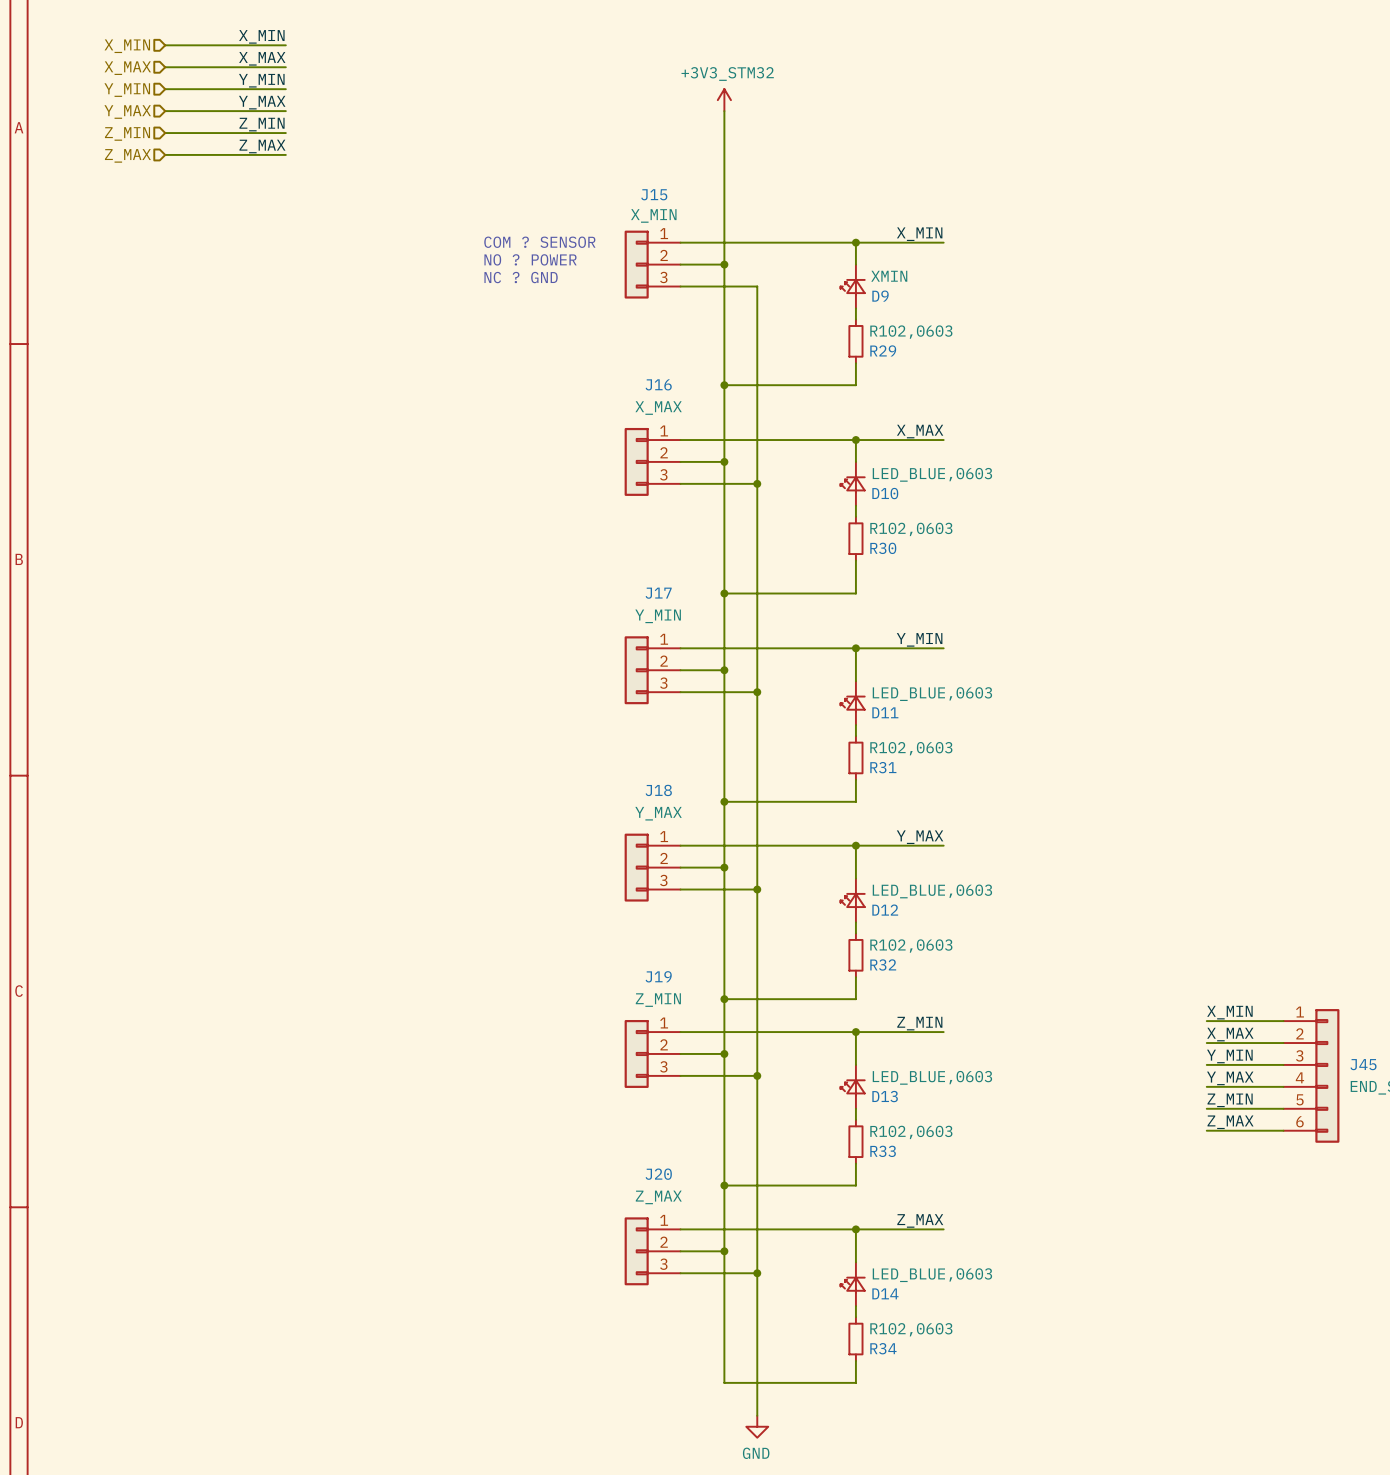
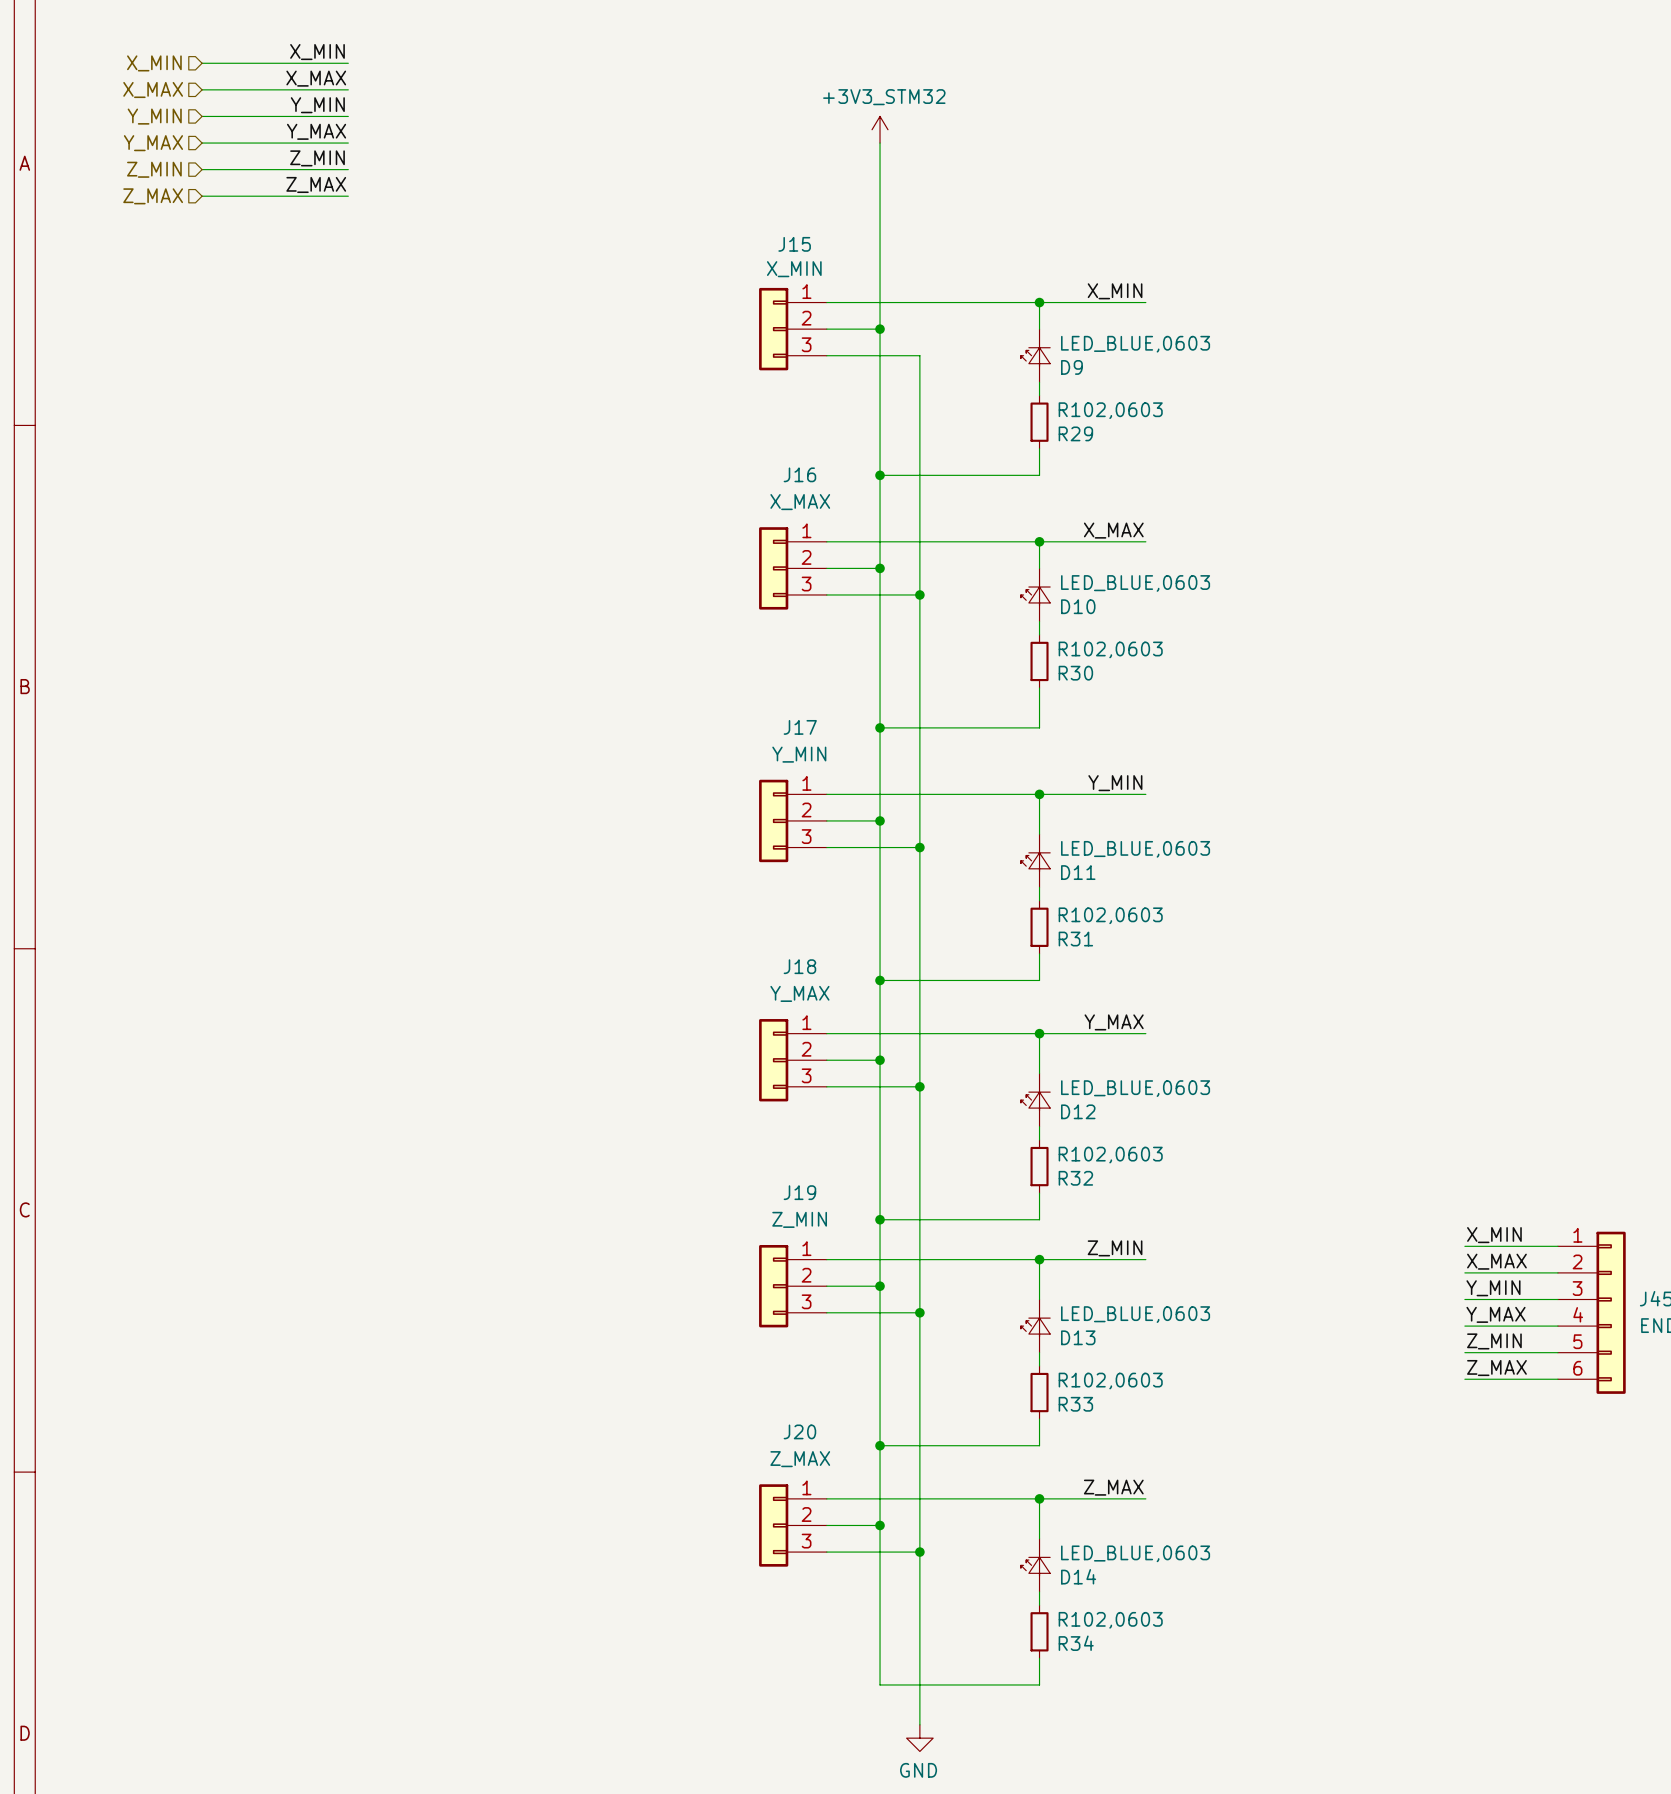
text: COM ? SENSOR (539, 242) -> none
text: NO ? POWER (530, 259) -> none
D9 value: XMIN (889, 276) -> LED_BLUE,0603 (1135, 344)
text: NC ? GND (521, 277) -> none

